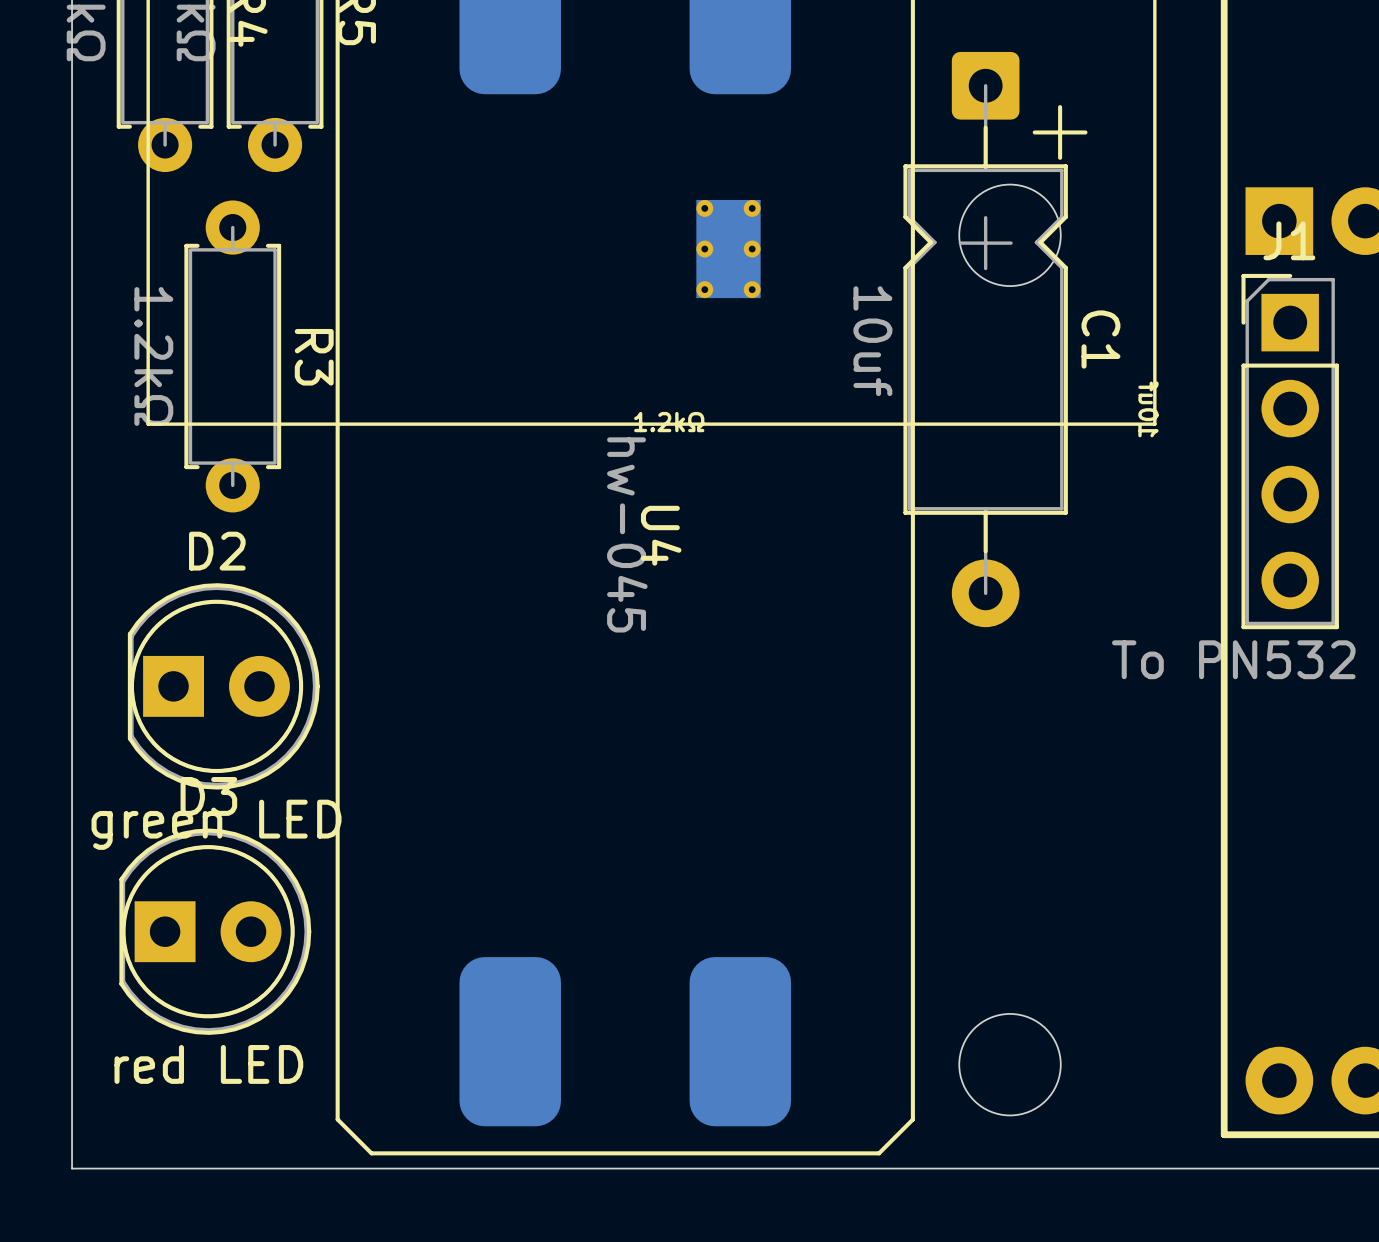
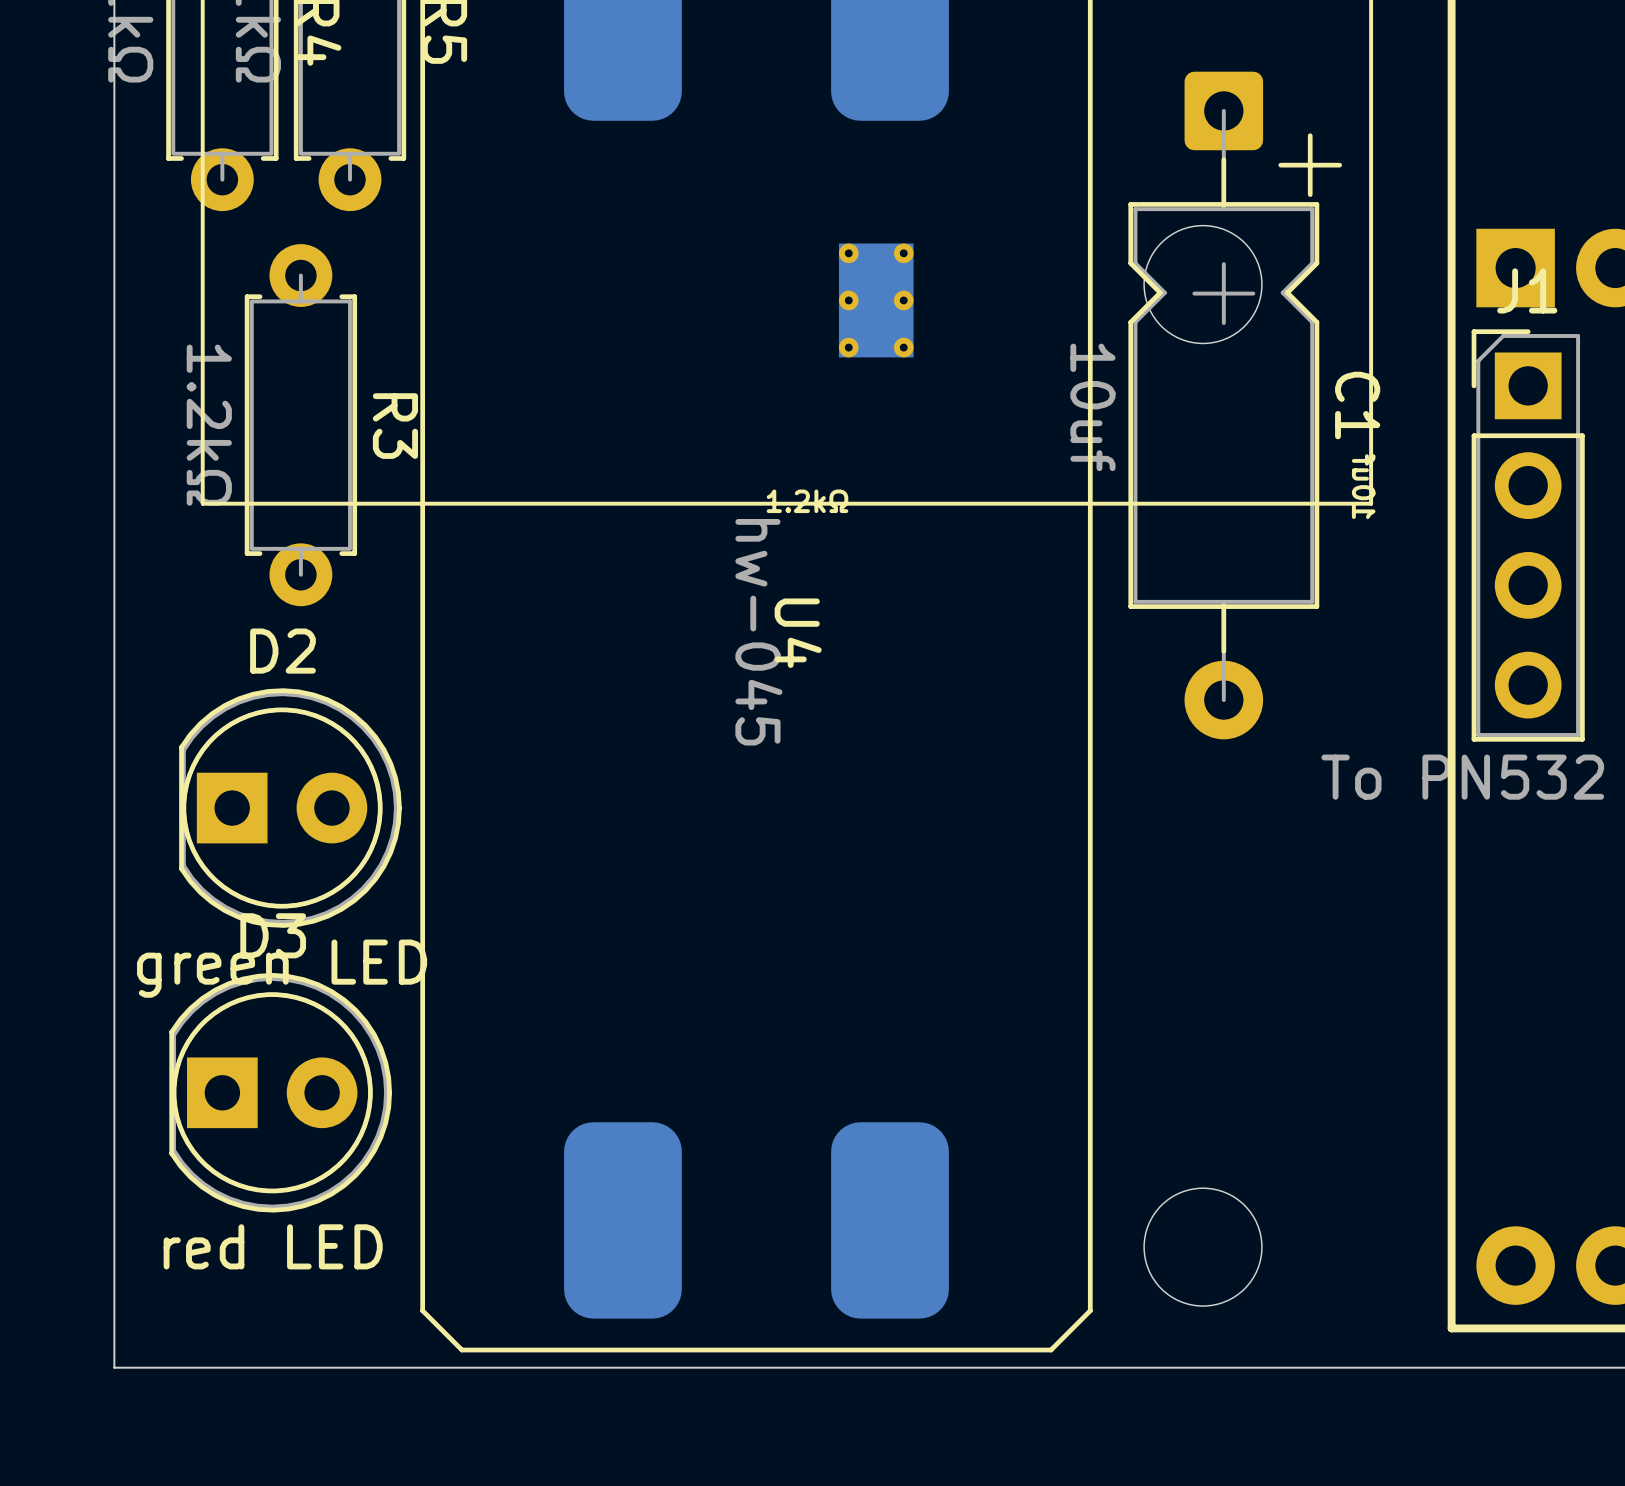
C1 position: (995, 339) -> (1235, 405)

